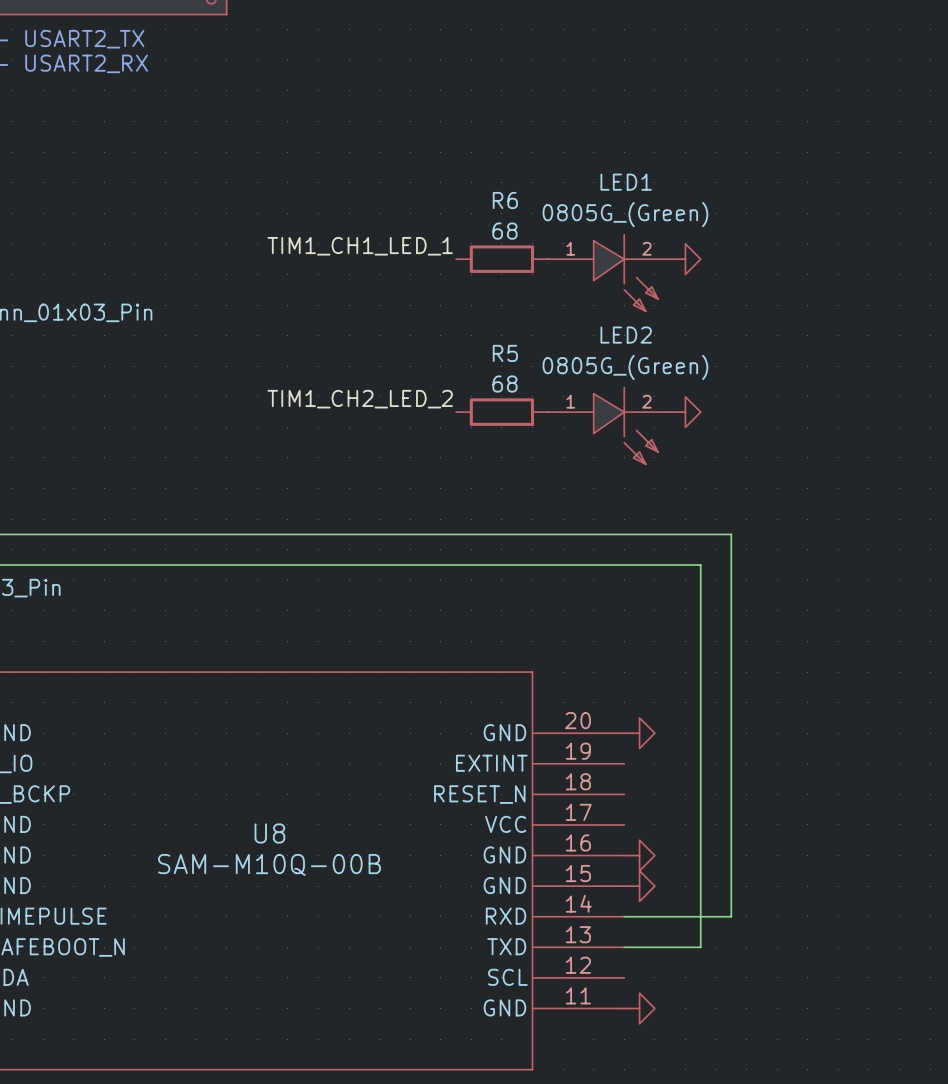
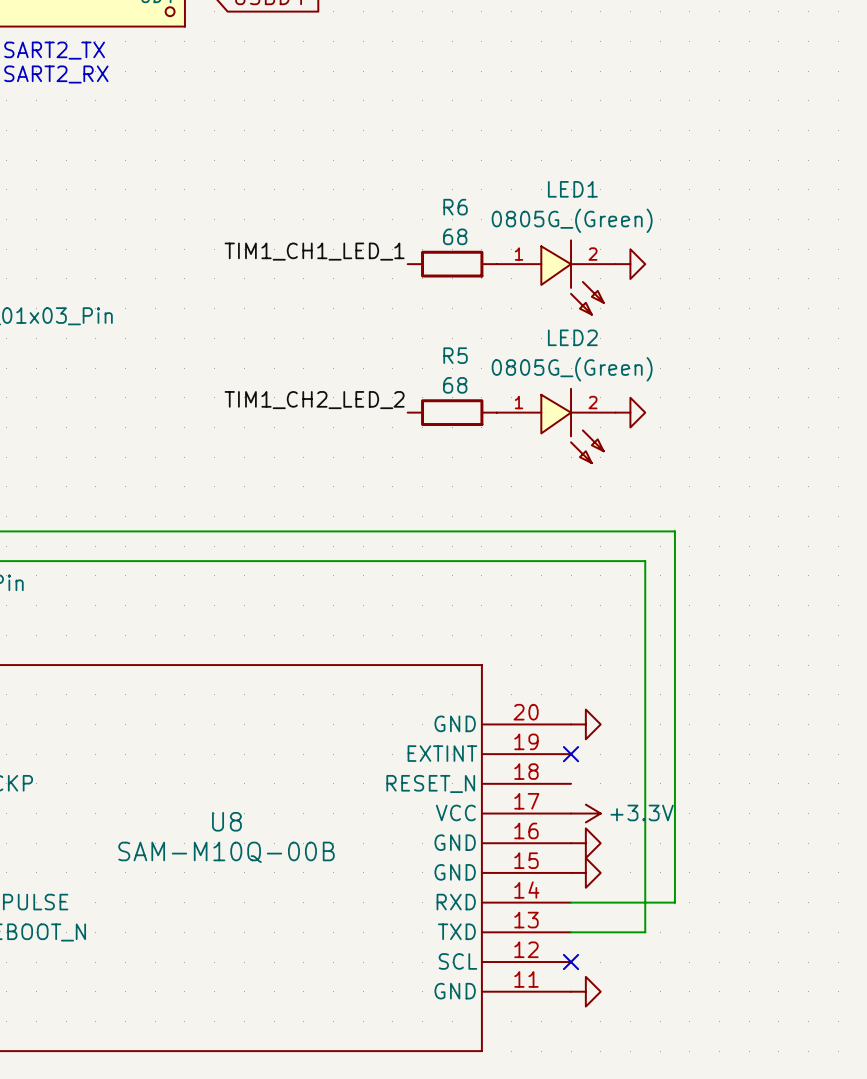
no-connect mark: none -> (571, 754)
power symbol: none -> +3.3V (585, 813)
no-connect mark: none -> (571, 962)

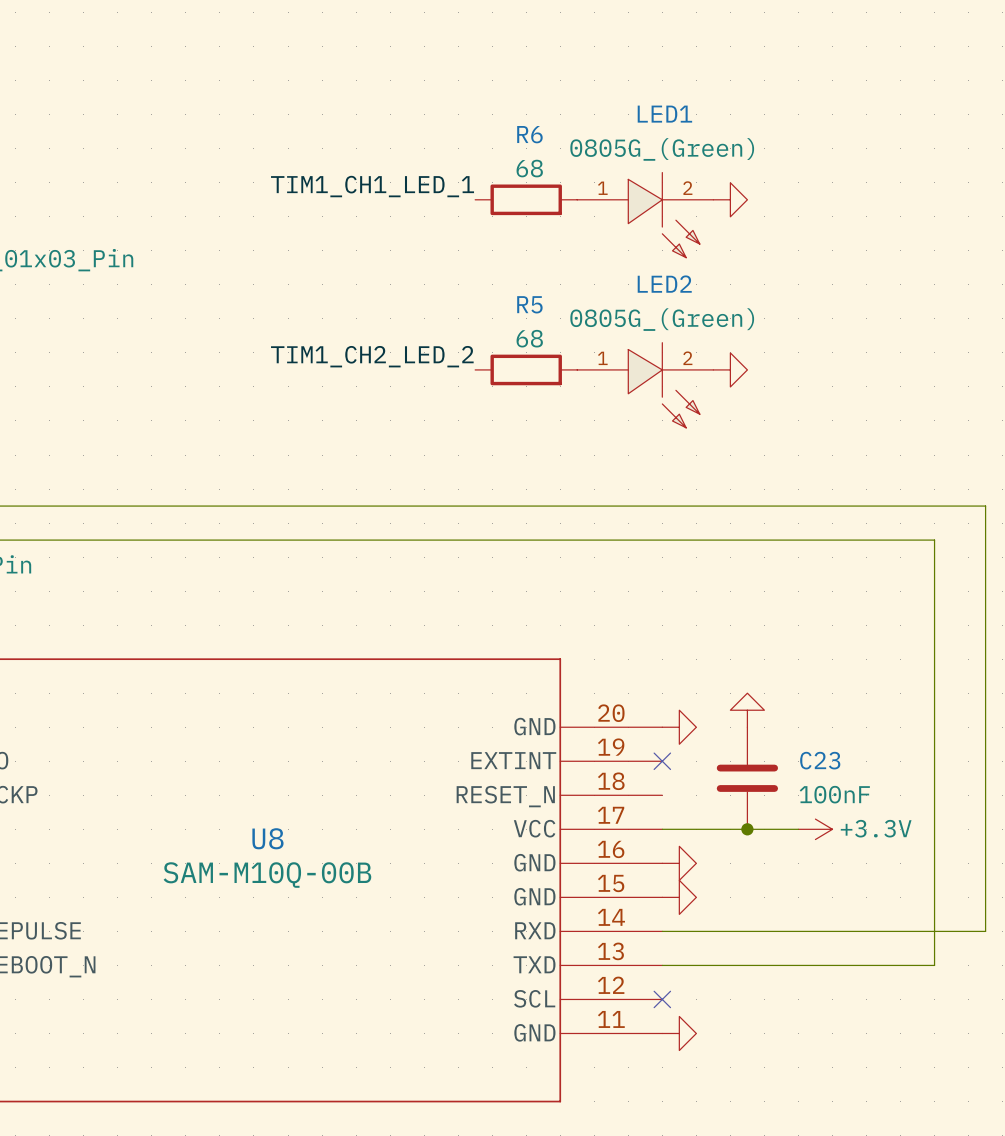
wire: (674, 531) (674, 902) -> (781, 506) (985, 506) (985, 931) (781, 931)
wire: (645, 561) (645, 932) -> (747, 540) (934, 540) (934, 965) (747, 965)
power symbol: none -> (747, 710)
C23: none -> 100nF (747, 778)
wire: none -> (662, 829) (798, 829)
power symbol position: +3.3V (585, 813) -> +3.3V (815, 829)
junction: none -> (747, 829)

